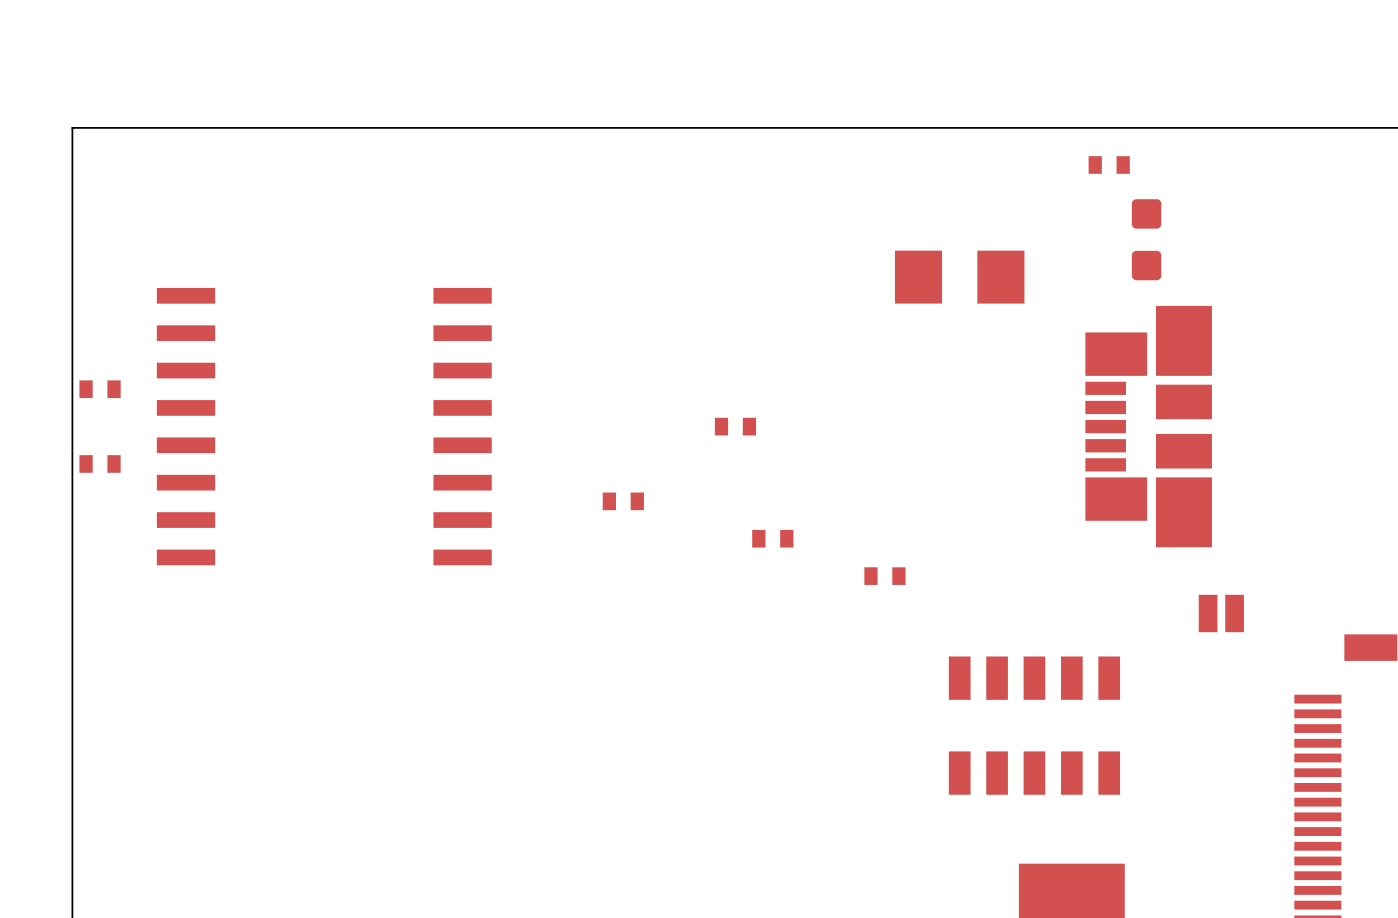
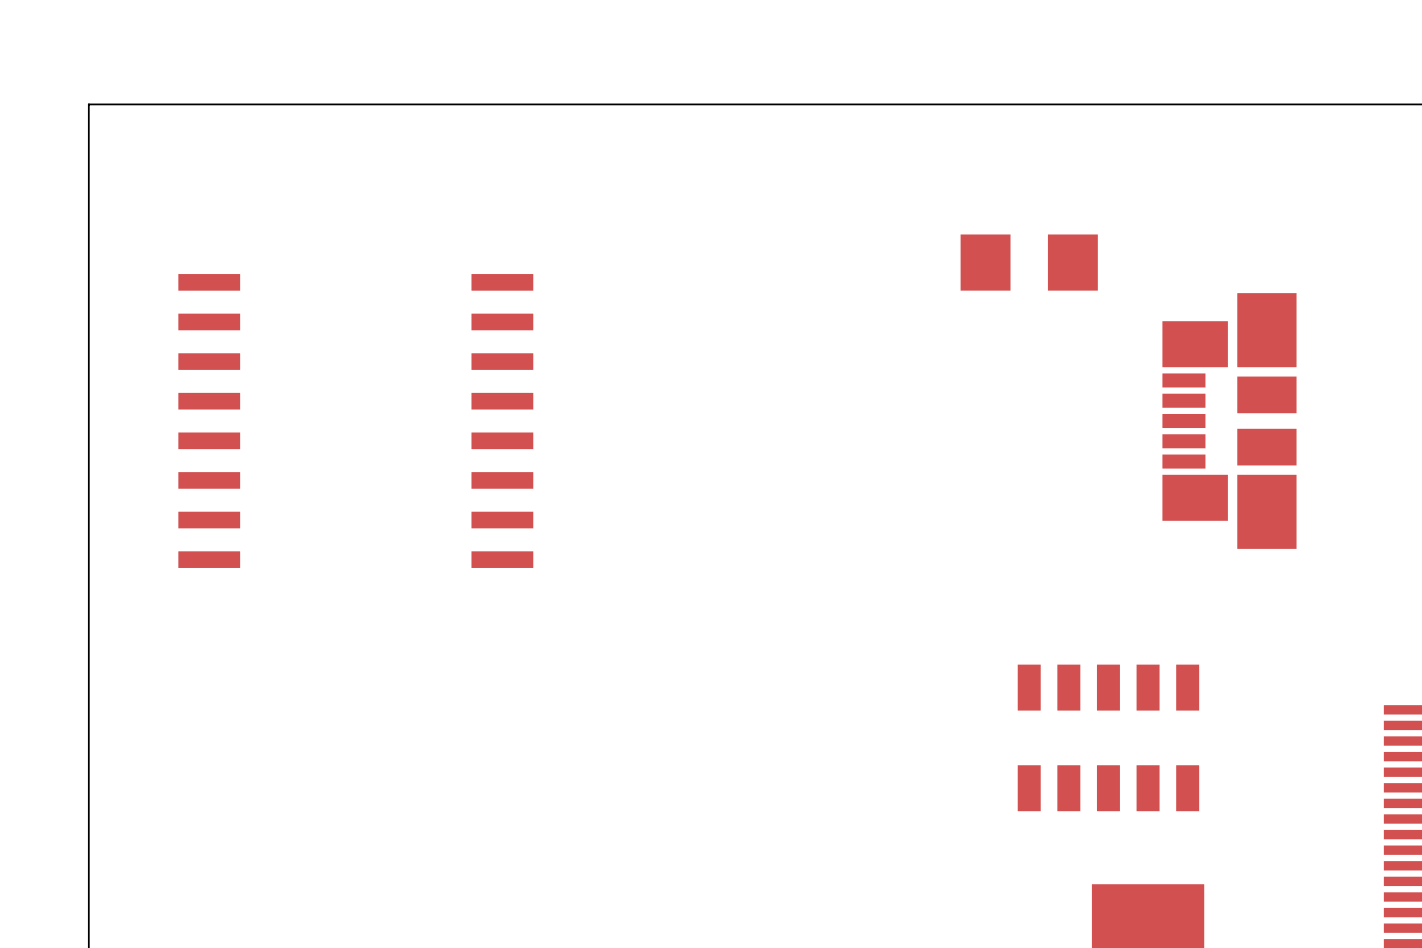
part: (1109, 164) -> none
part: (1146, 239) -> none
part: (100, 389) -> none
part: (735, 426) -> none
part: (100, 463) -> none
part: (623, 501) -> none
part: (772, 538) -> none
part: (884, 576) -> none
part: (1221, 613) -> none

